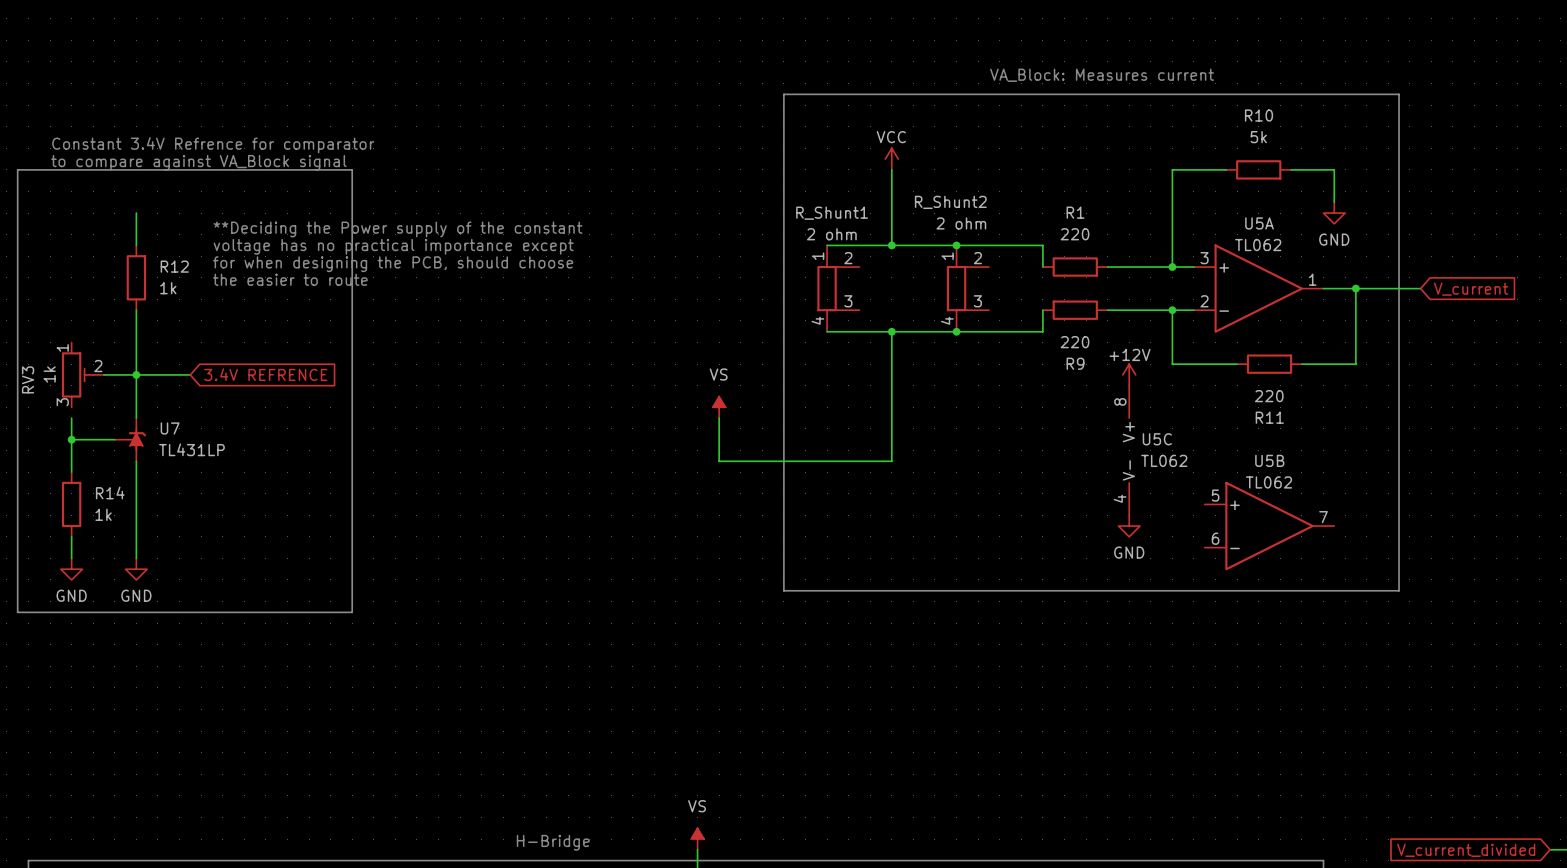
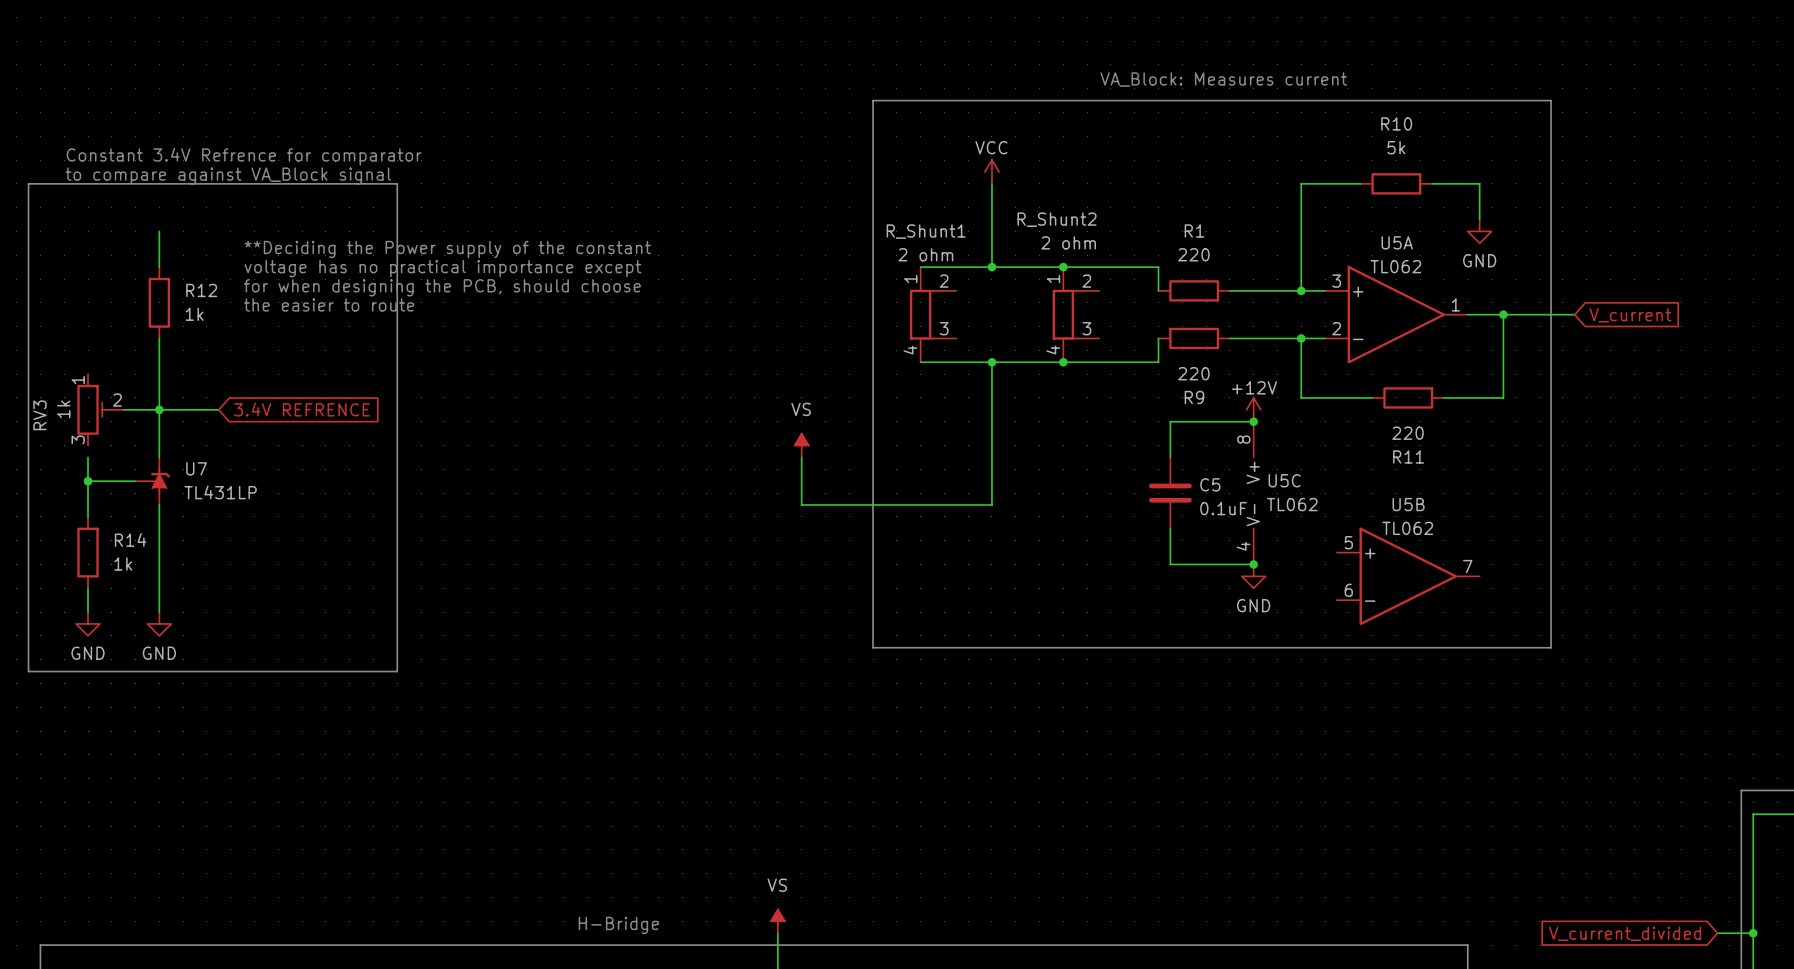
wire: none -> (1253, 421) (1170, 421) (1170, 457)
junction: none -> (1253, 421)
C5: none -> 0.1uF (1170, 493)
wire: none -> (1170, 528) (1170, 564) (1253, 564)
junction: none -> (1253, 564)

